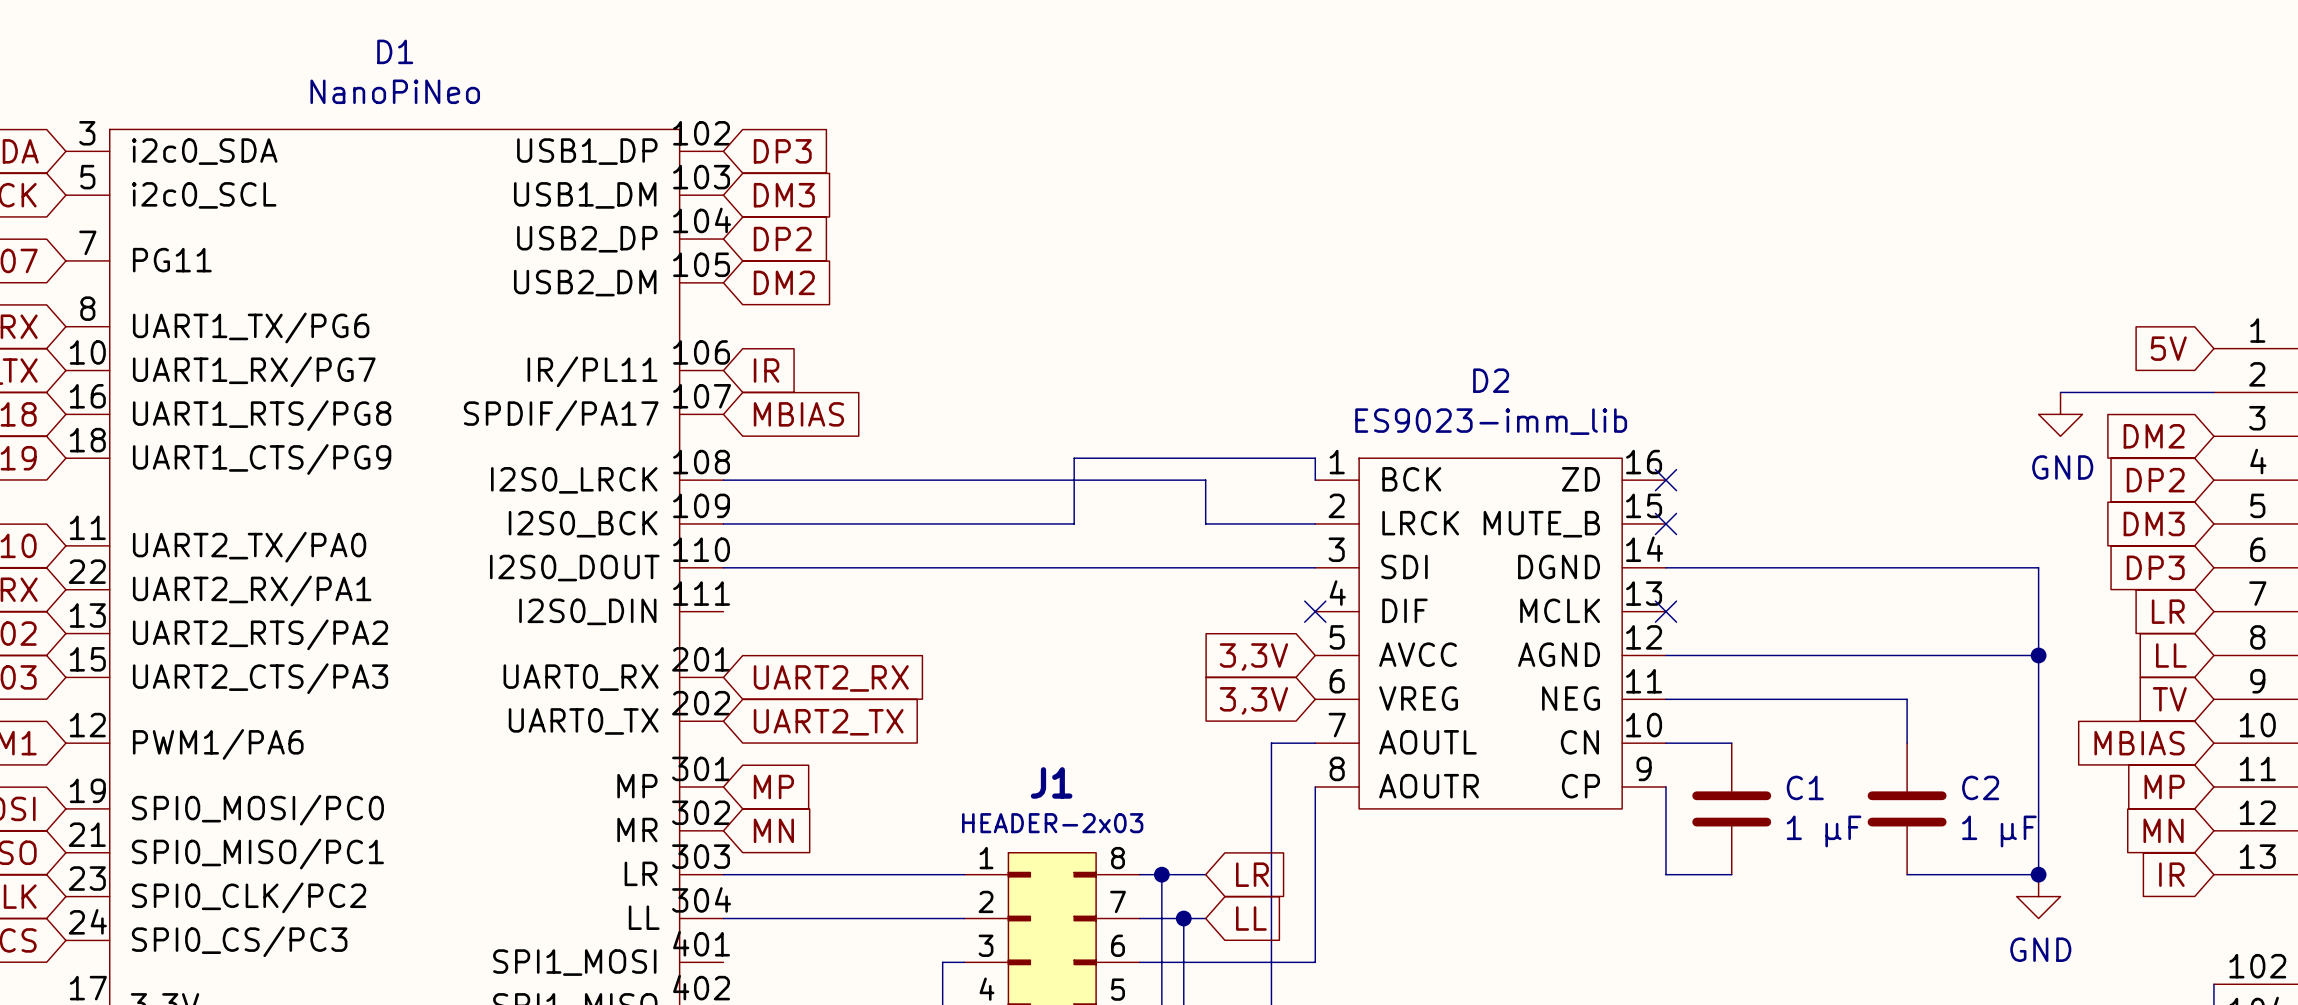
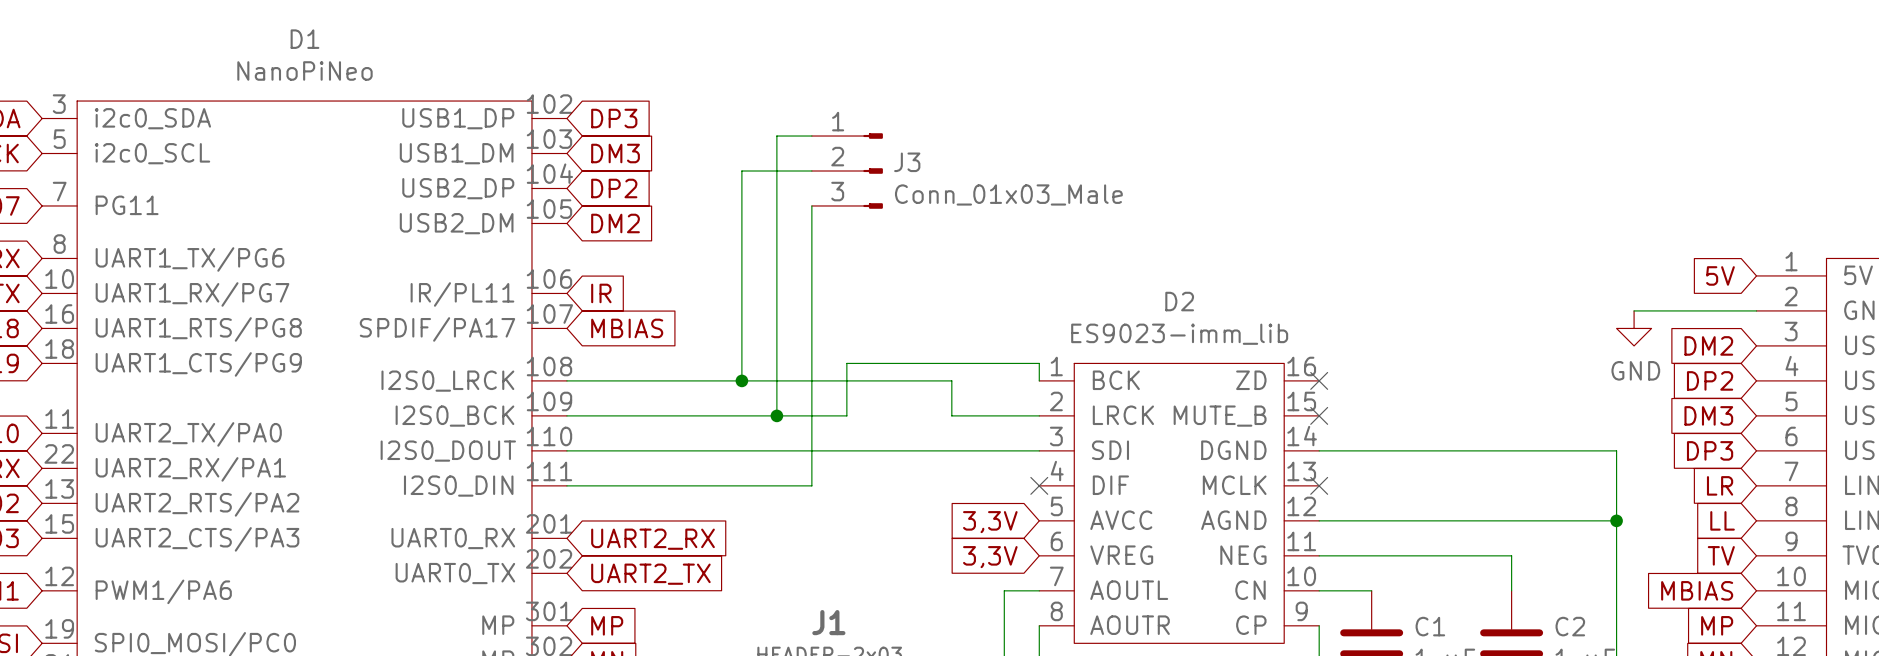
wire: none -> (811, 136) (776, 136) (776, 415)
wire: none -> (811, 171) (741, 171) (741, 380)
J3: none -> Conn_01x03_Male (847, 171)
wire: none -> (811, 205) (811, 485) (566, 485)
junction: none -> (741, 380)
junction: none -> (776, 415)

